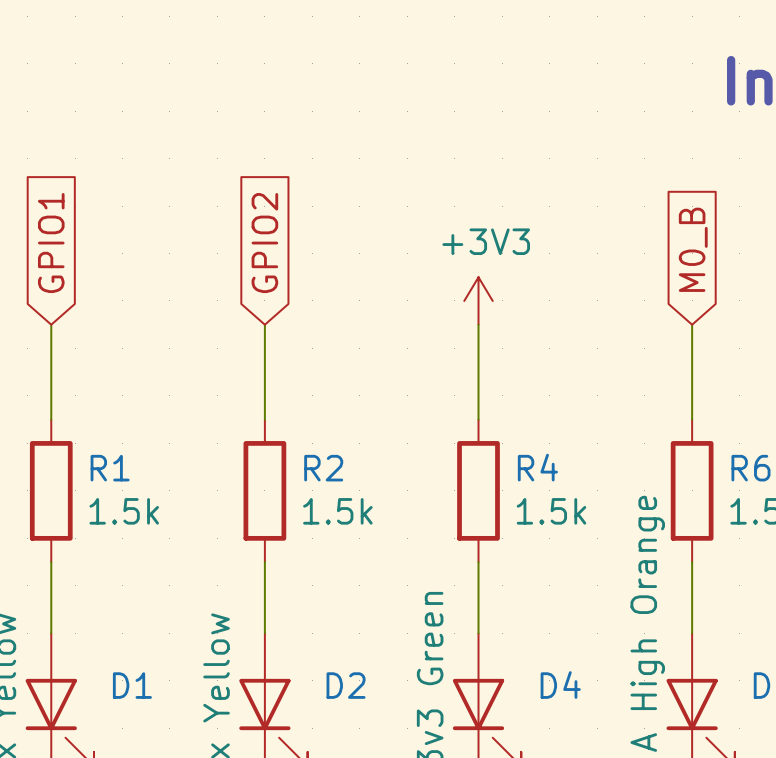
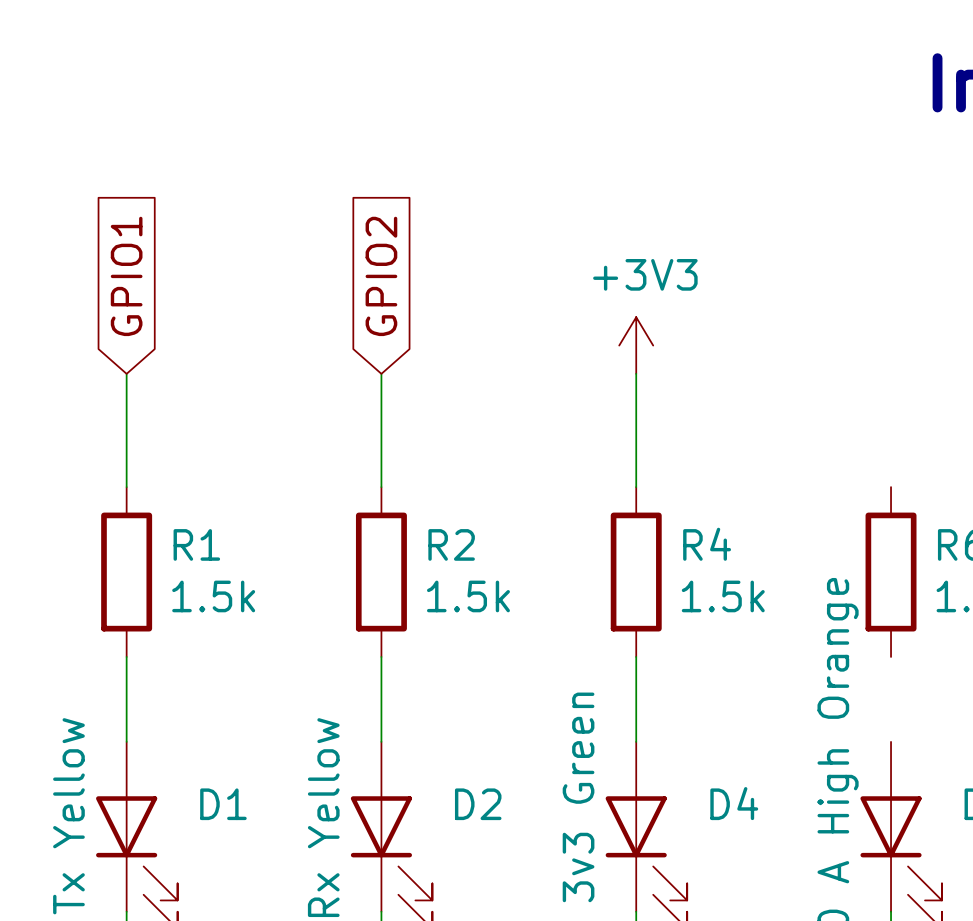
global label: M0_B (693, 249) -> none
wire: (692, 324) (692, 419) -> none
wire: (692, 562) (692, 633) -> none

